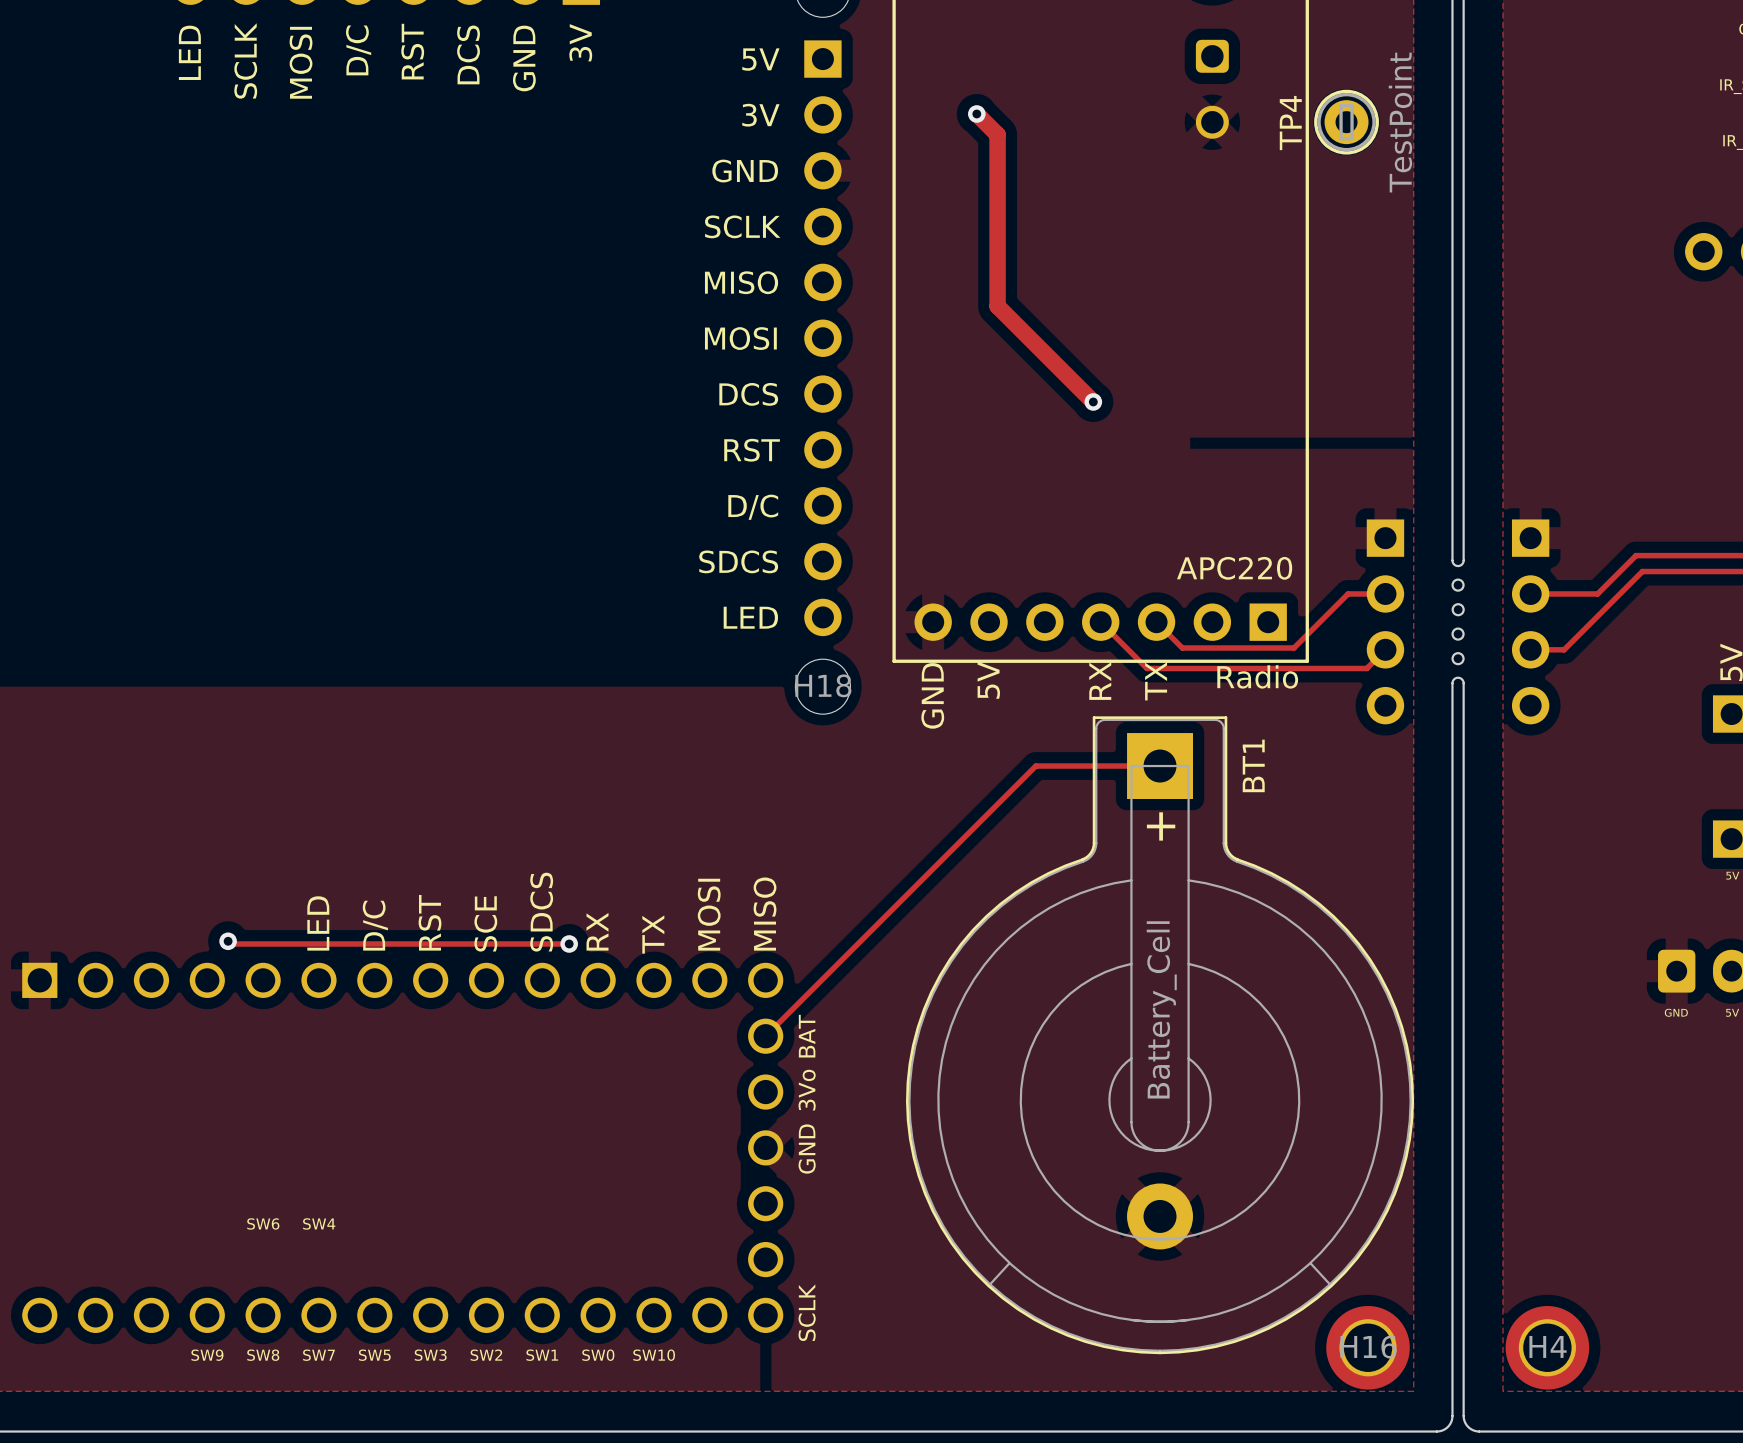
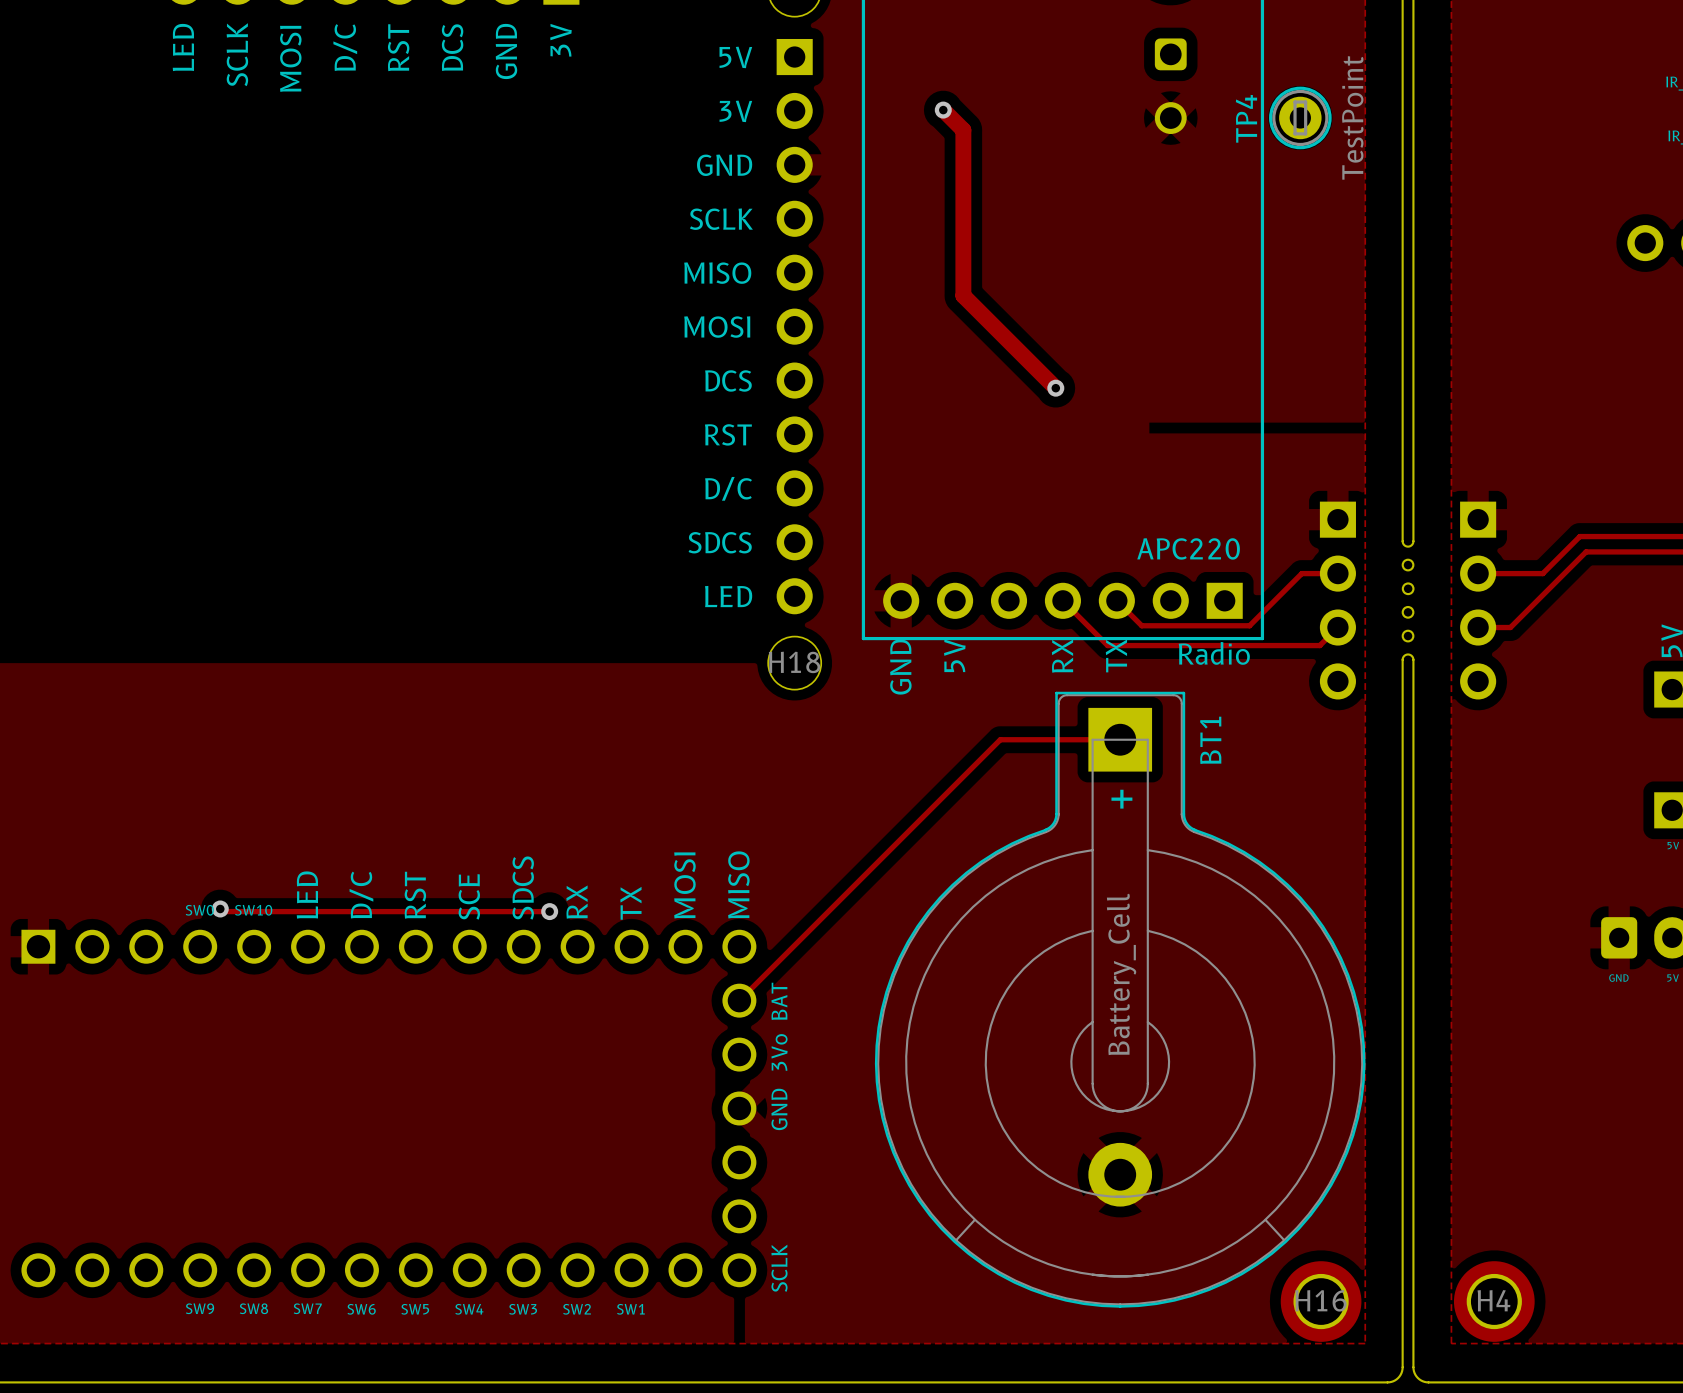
text: none -> SW0 (199, 910)
text: none -> SW10 (253, 910)
text: SW6 (263, 1223) -> none
text: SW4 (319, 1223) -> none
text: SW5 (374, 1355) -> SW6 (361, 1309)
text: SW3 (430, 1355) -> SW5 (415, 1309)
text: SW2 (486, 1355) -> SW4 (469, 1309)
text: SW1 (542, 1355) -> SW3 (523, 1309)
text: SW0 (598, 1355) -> SW2 (577, 1309)
text: SW10 (654, 1355) -> SW1 (630, 1309)

